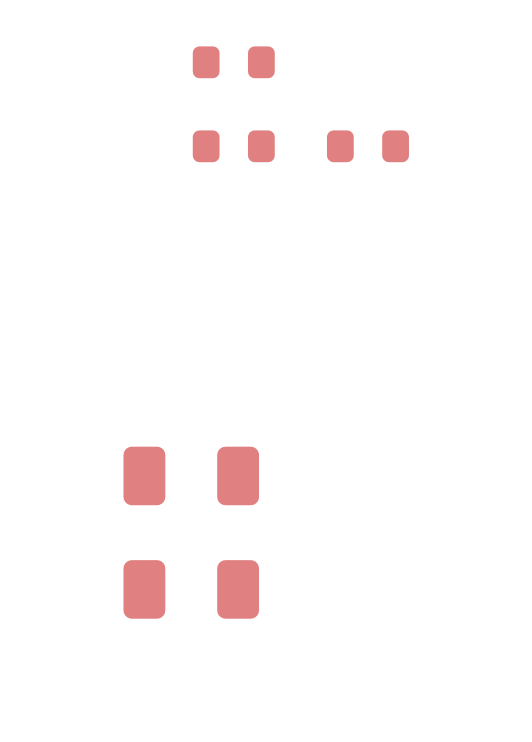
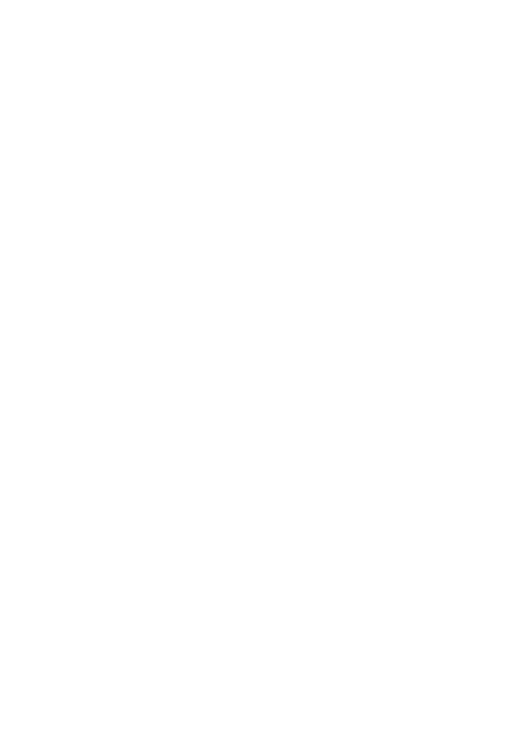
part: (233, 62) -> none
part: (233, 146) -> none
part: (367, 146) -> none
part: (191, 475) -> none
part: (191, 589) -> none

